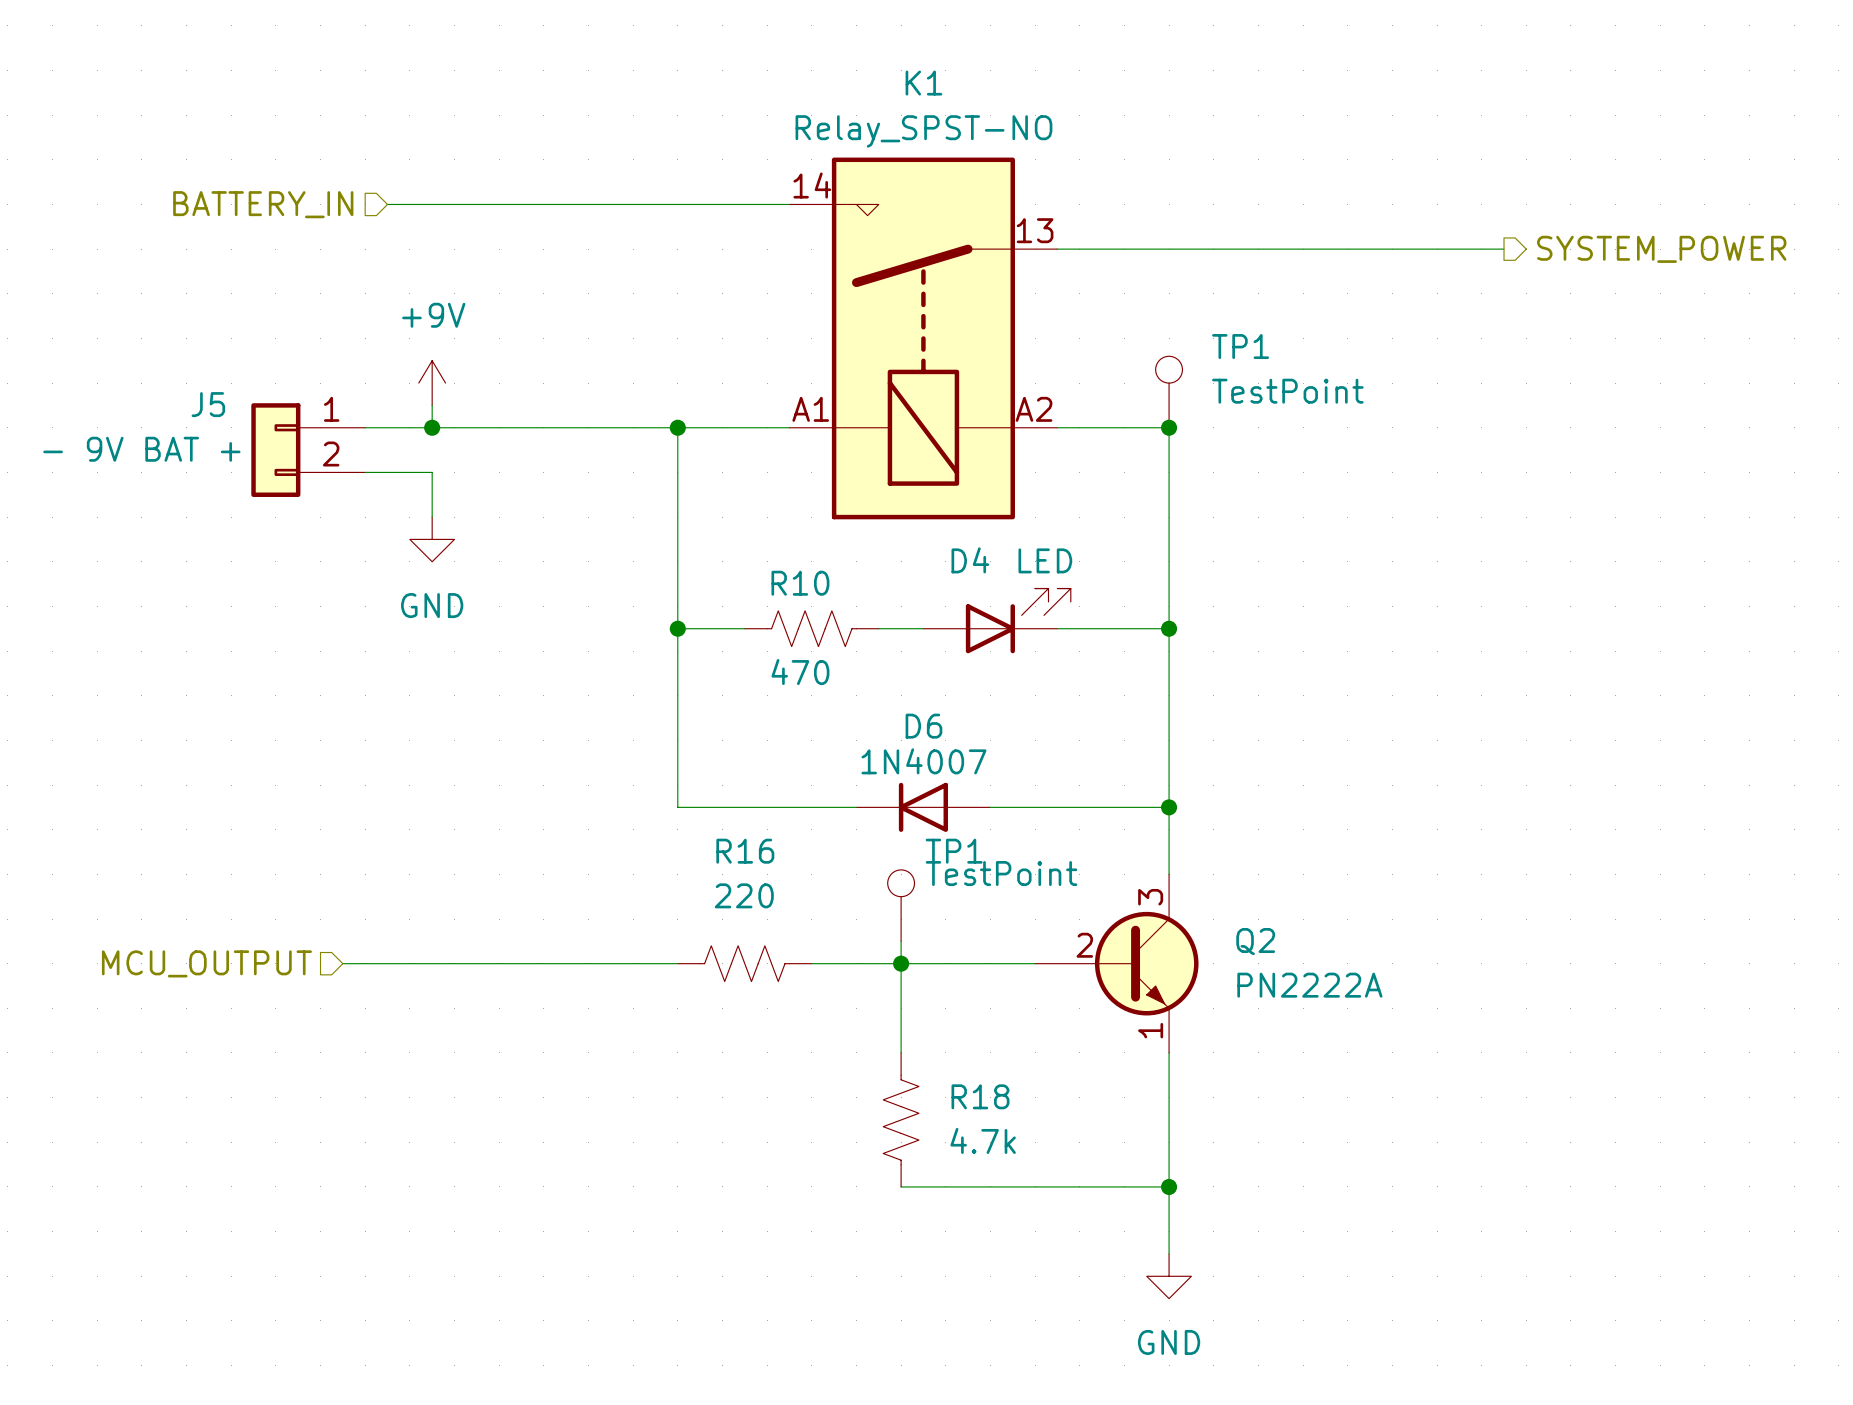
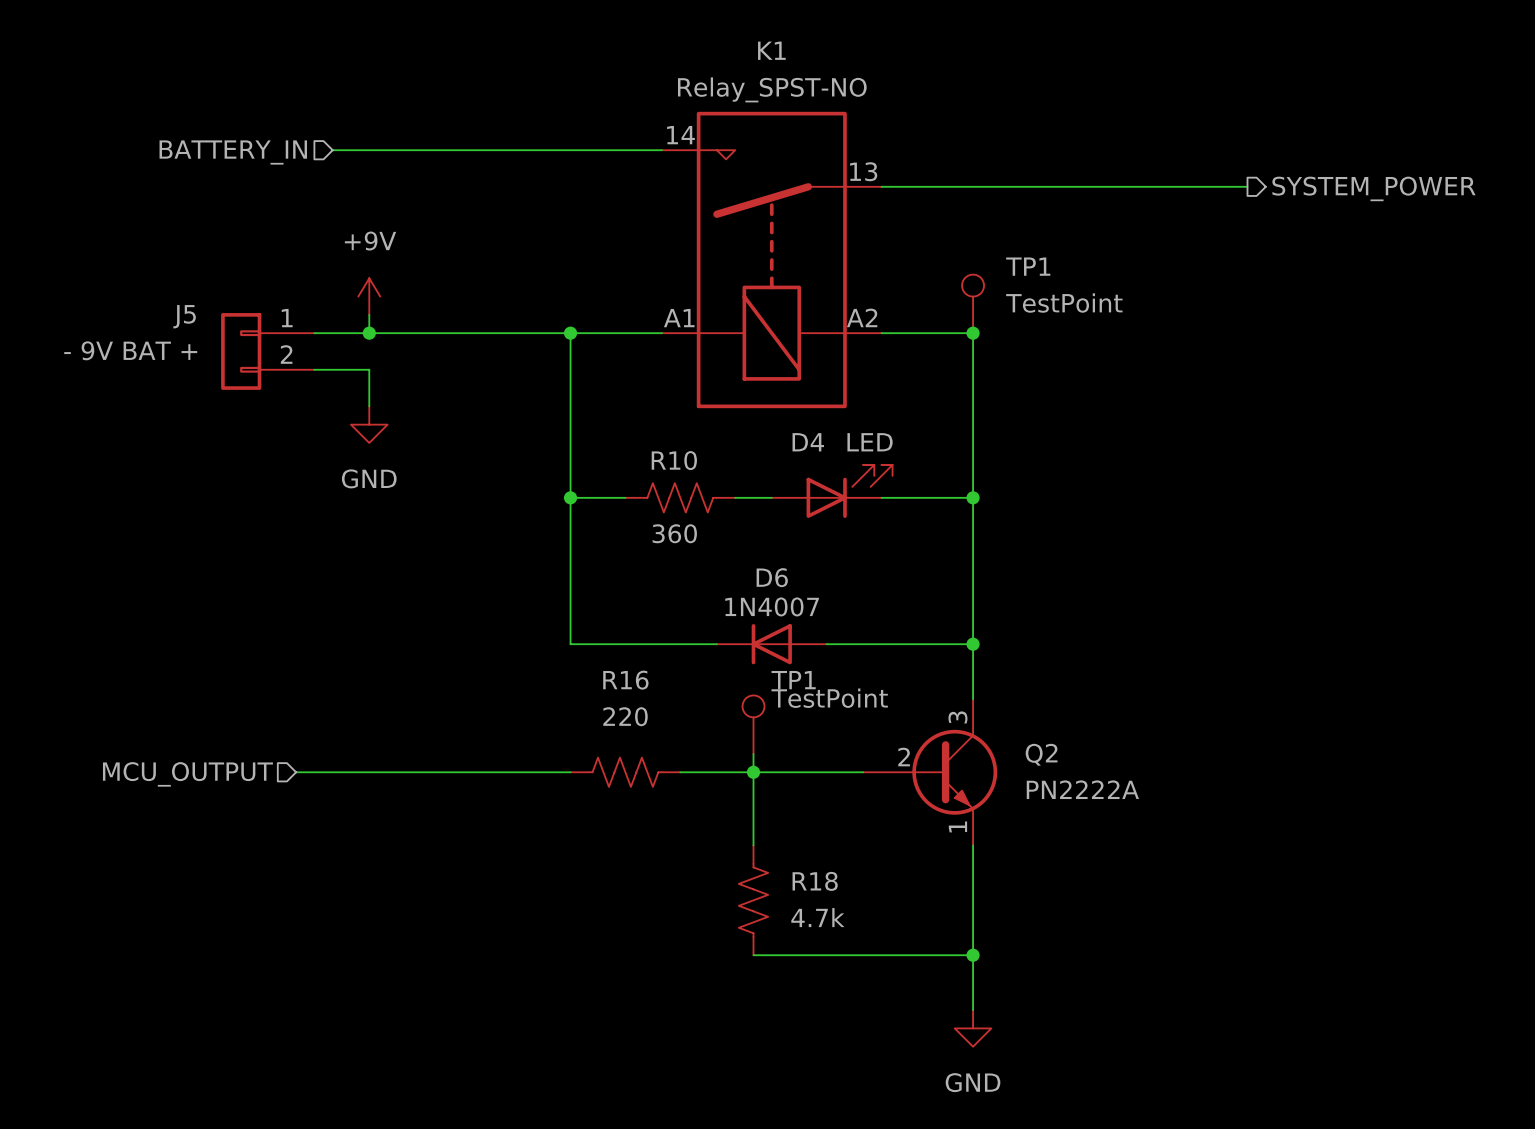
R10 value: 470 (800, 672) -> 360 (674, 533)

